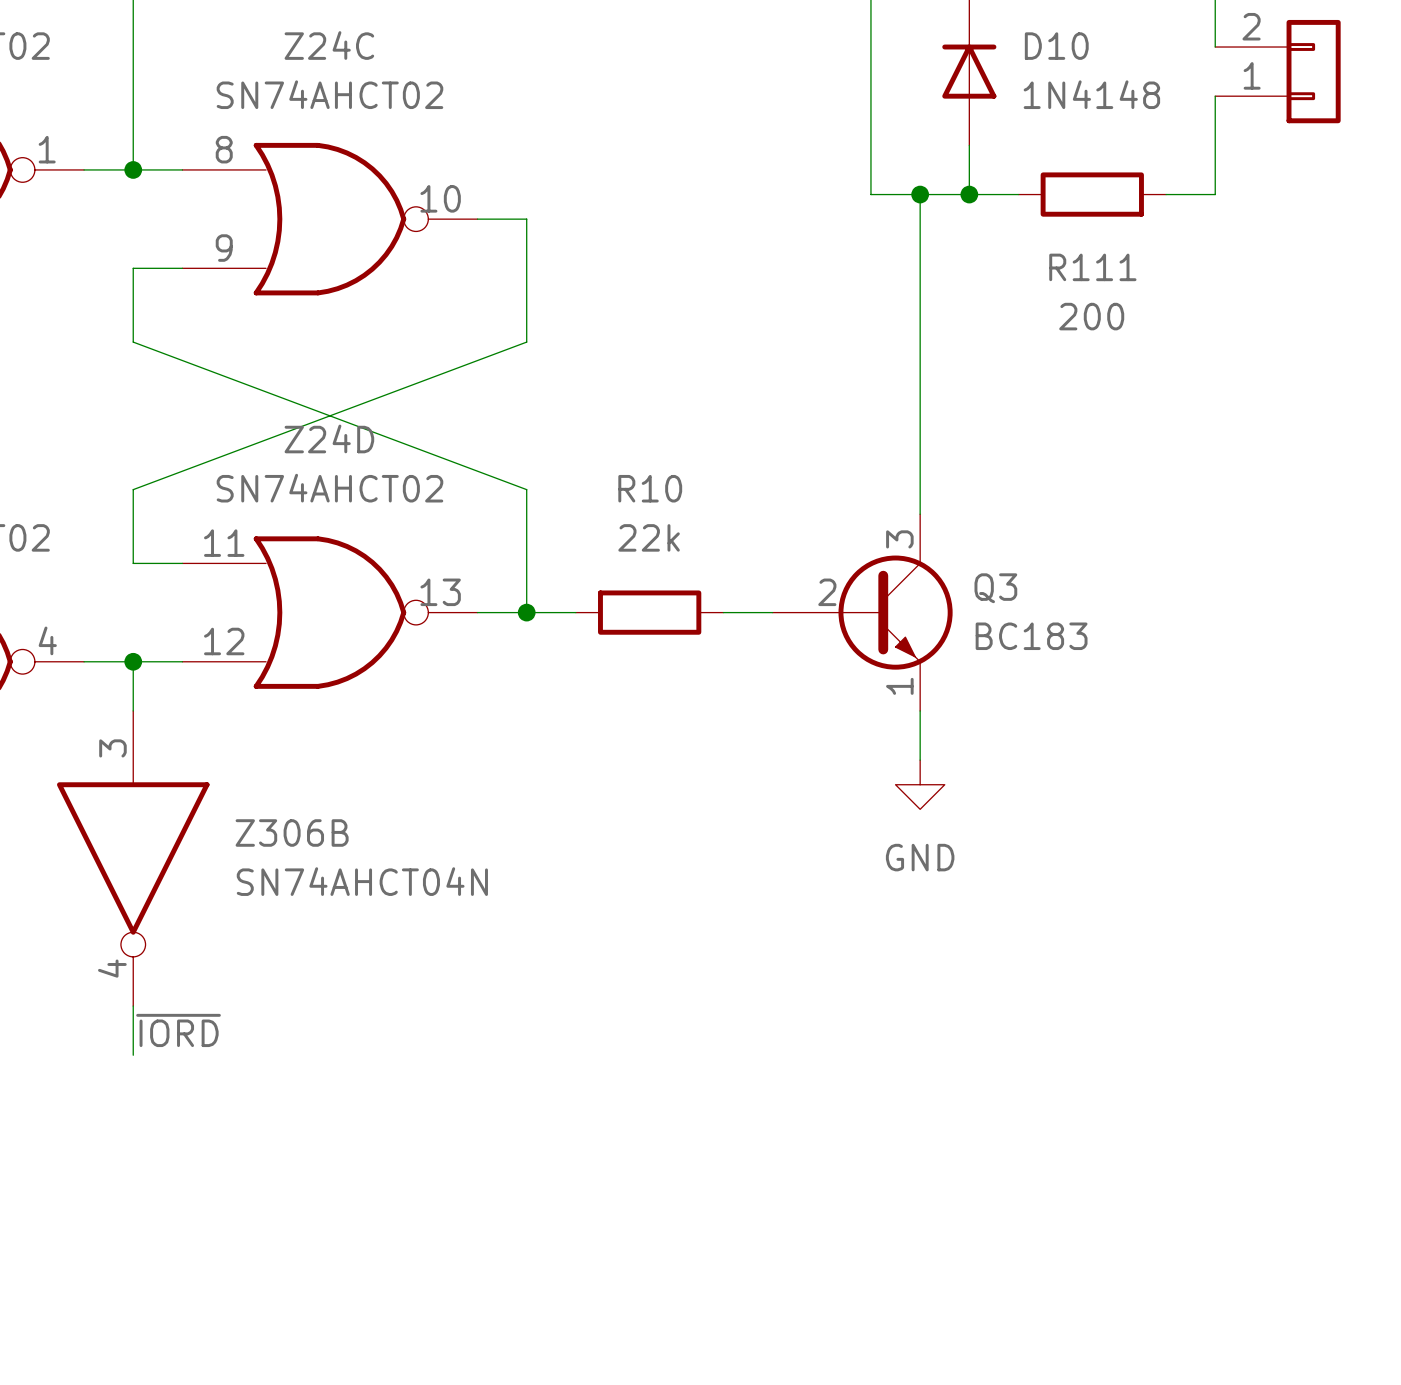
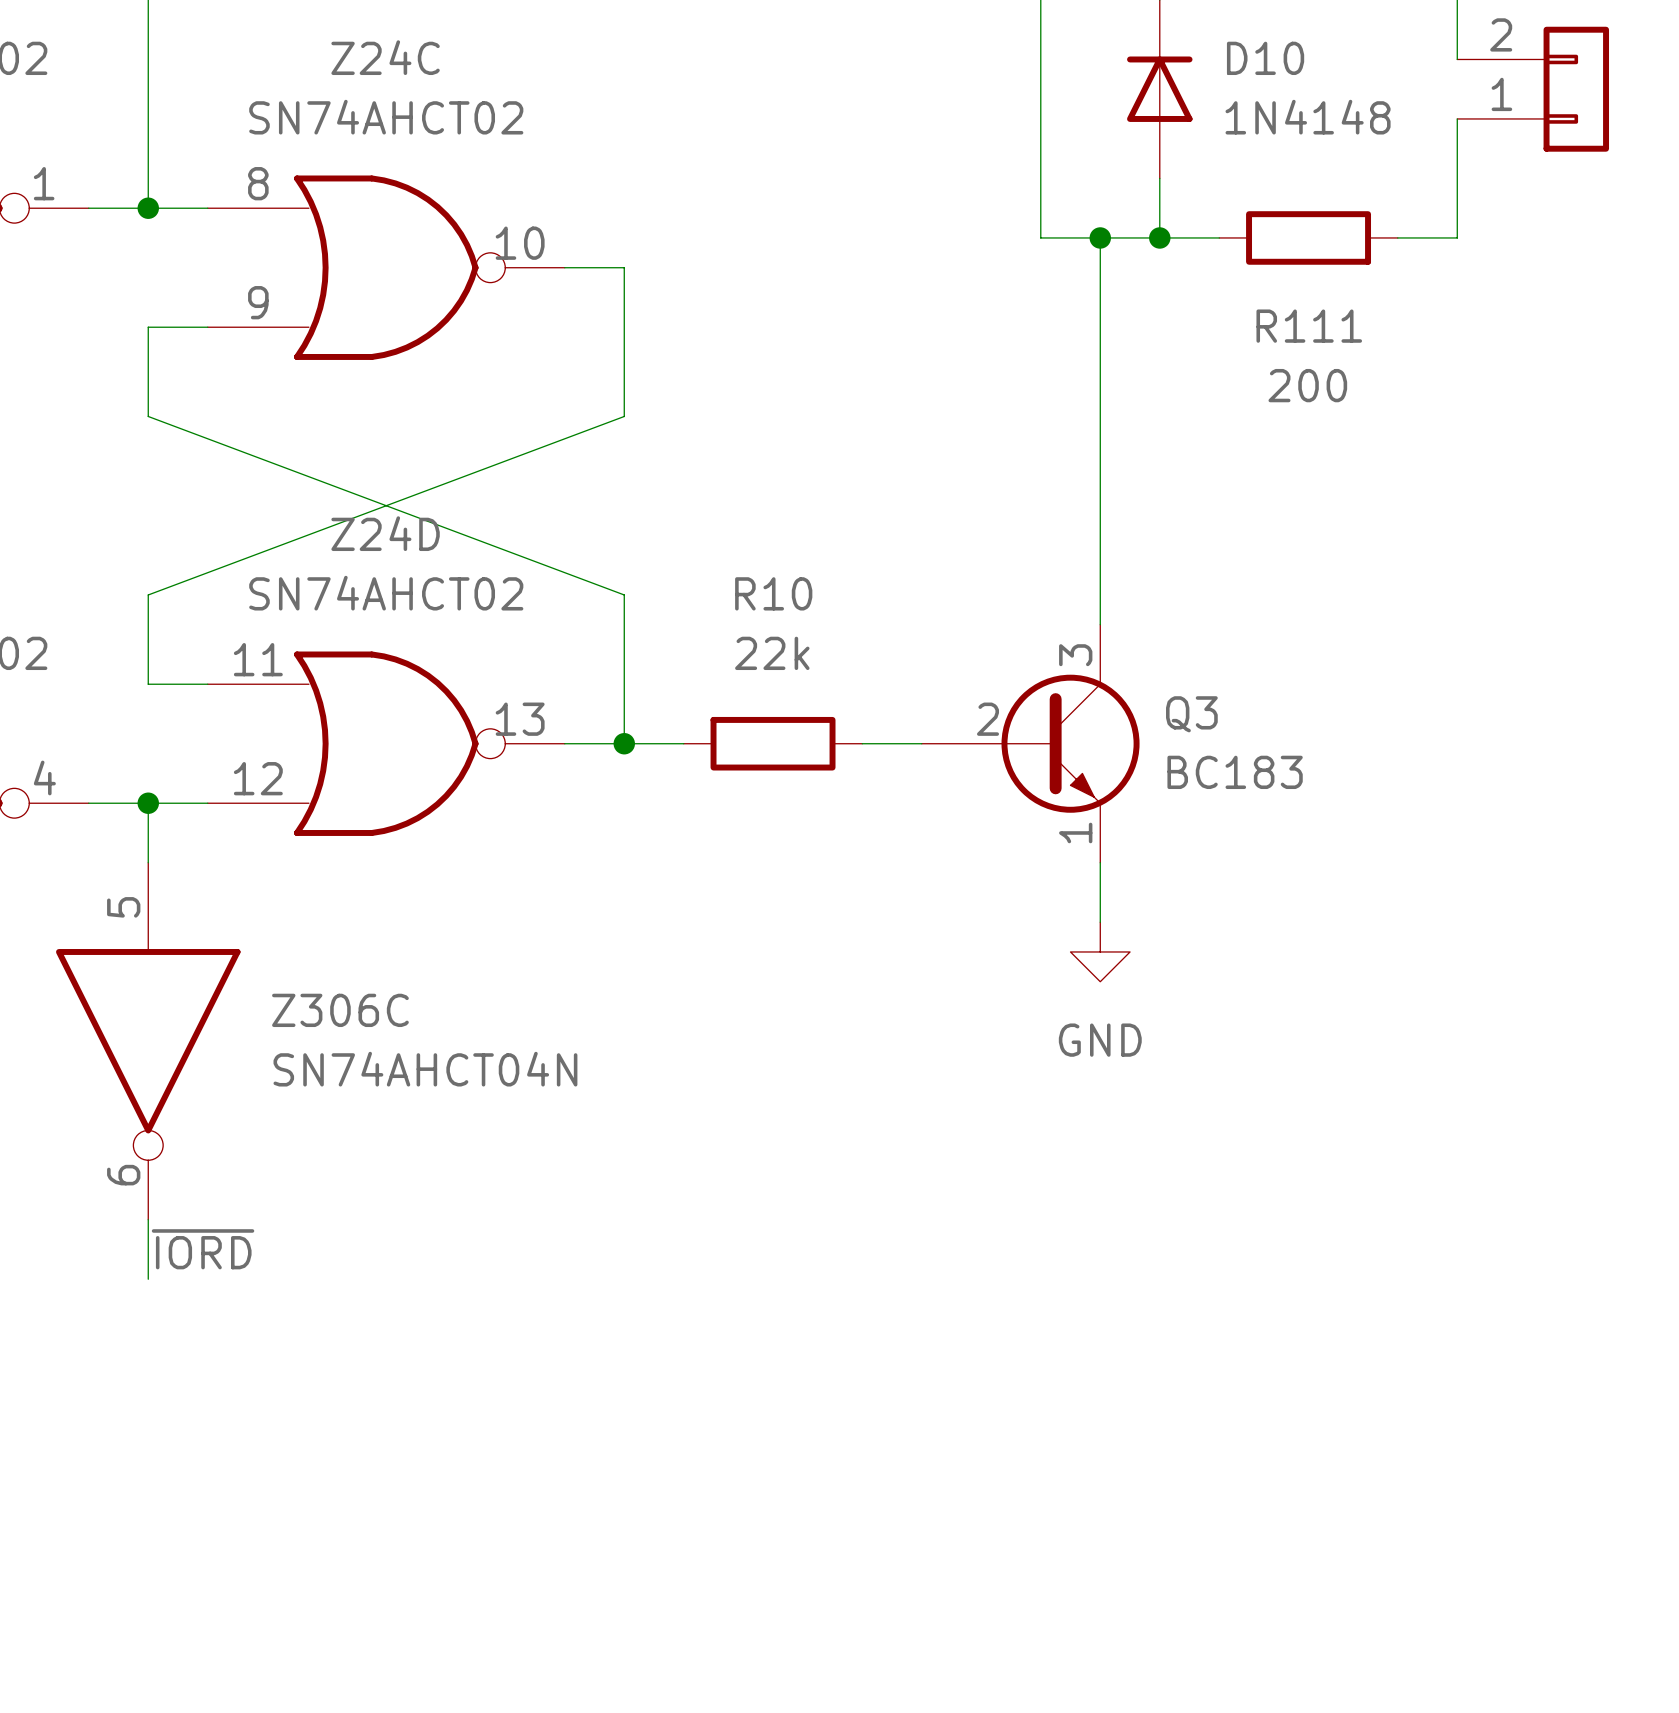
Z306B pin number: 3 (112, 748) -> 5 (123, 907)
Z306B name: Z306B (292, 832) -> Z306C (340, 1010)
Z306B pin number: 4 (112, 968) -> 6 (123, 1175)

